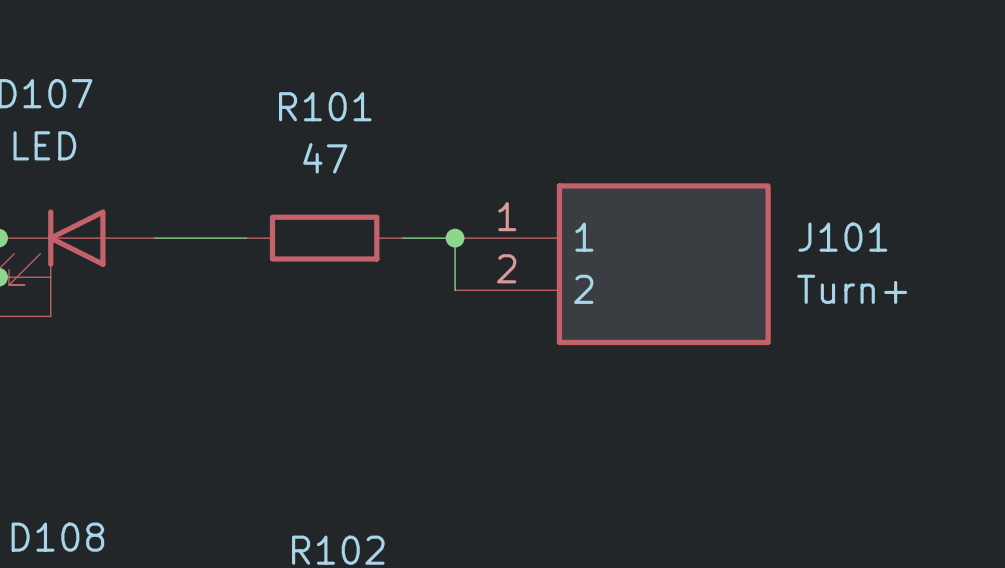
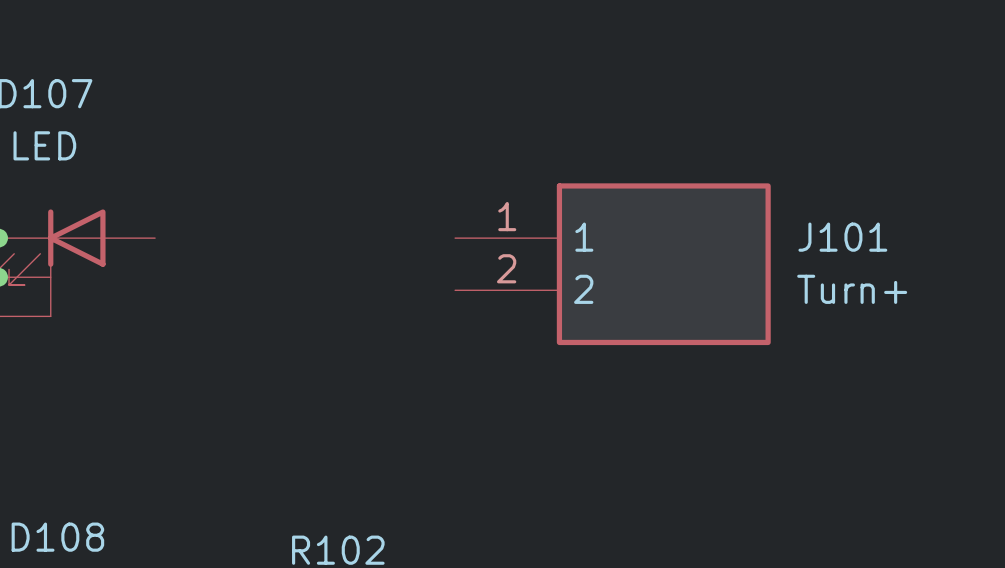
wire: (155, 238) (246, 238) -> none
R101: 47 (324, 238) -> none
wire: (402, 238) (455, 238) (455, 290) -> none
junction: (455, 238) -> none

